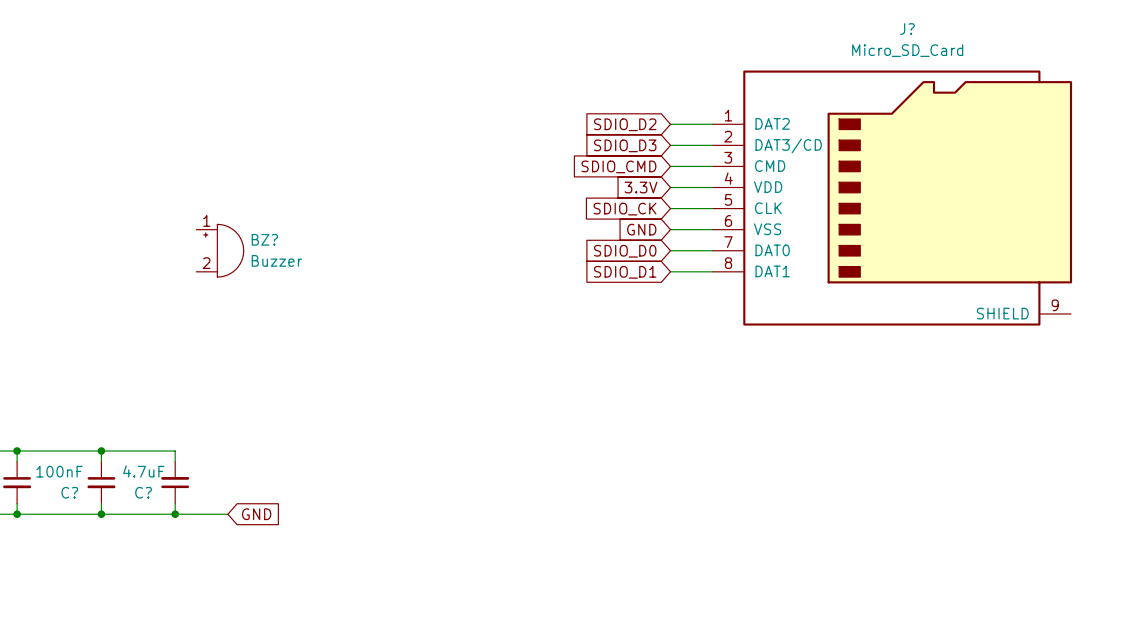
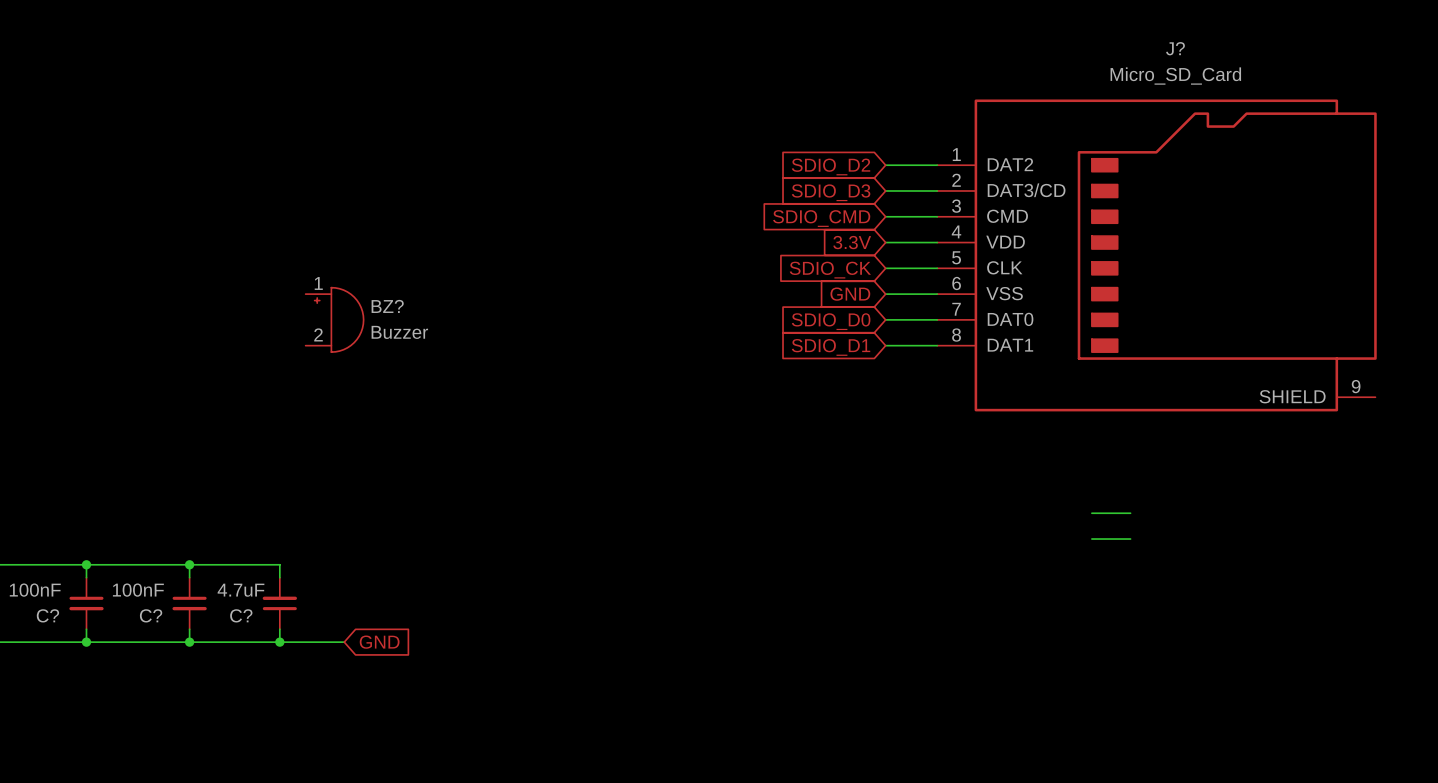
wire: none -> (1091, 513) (1130, 513)
wire: none -> (1091, 539) (1130, 539)

